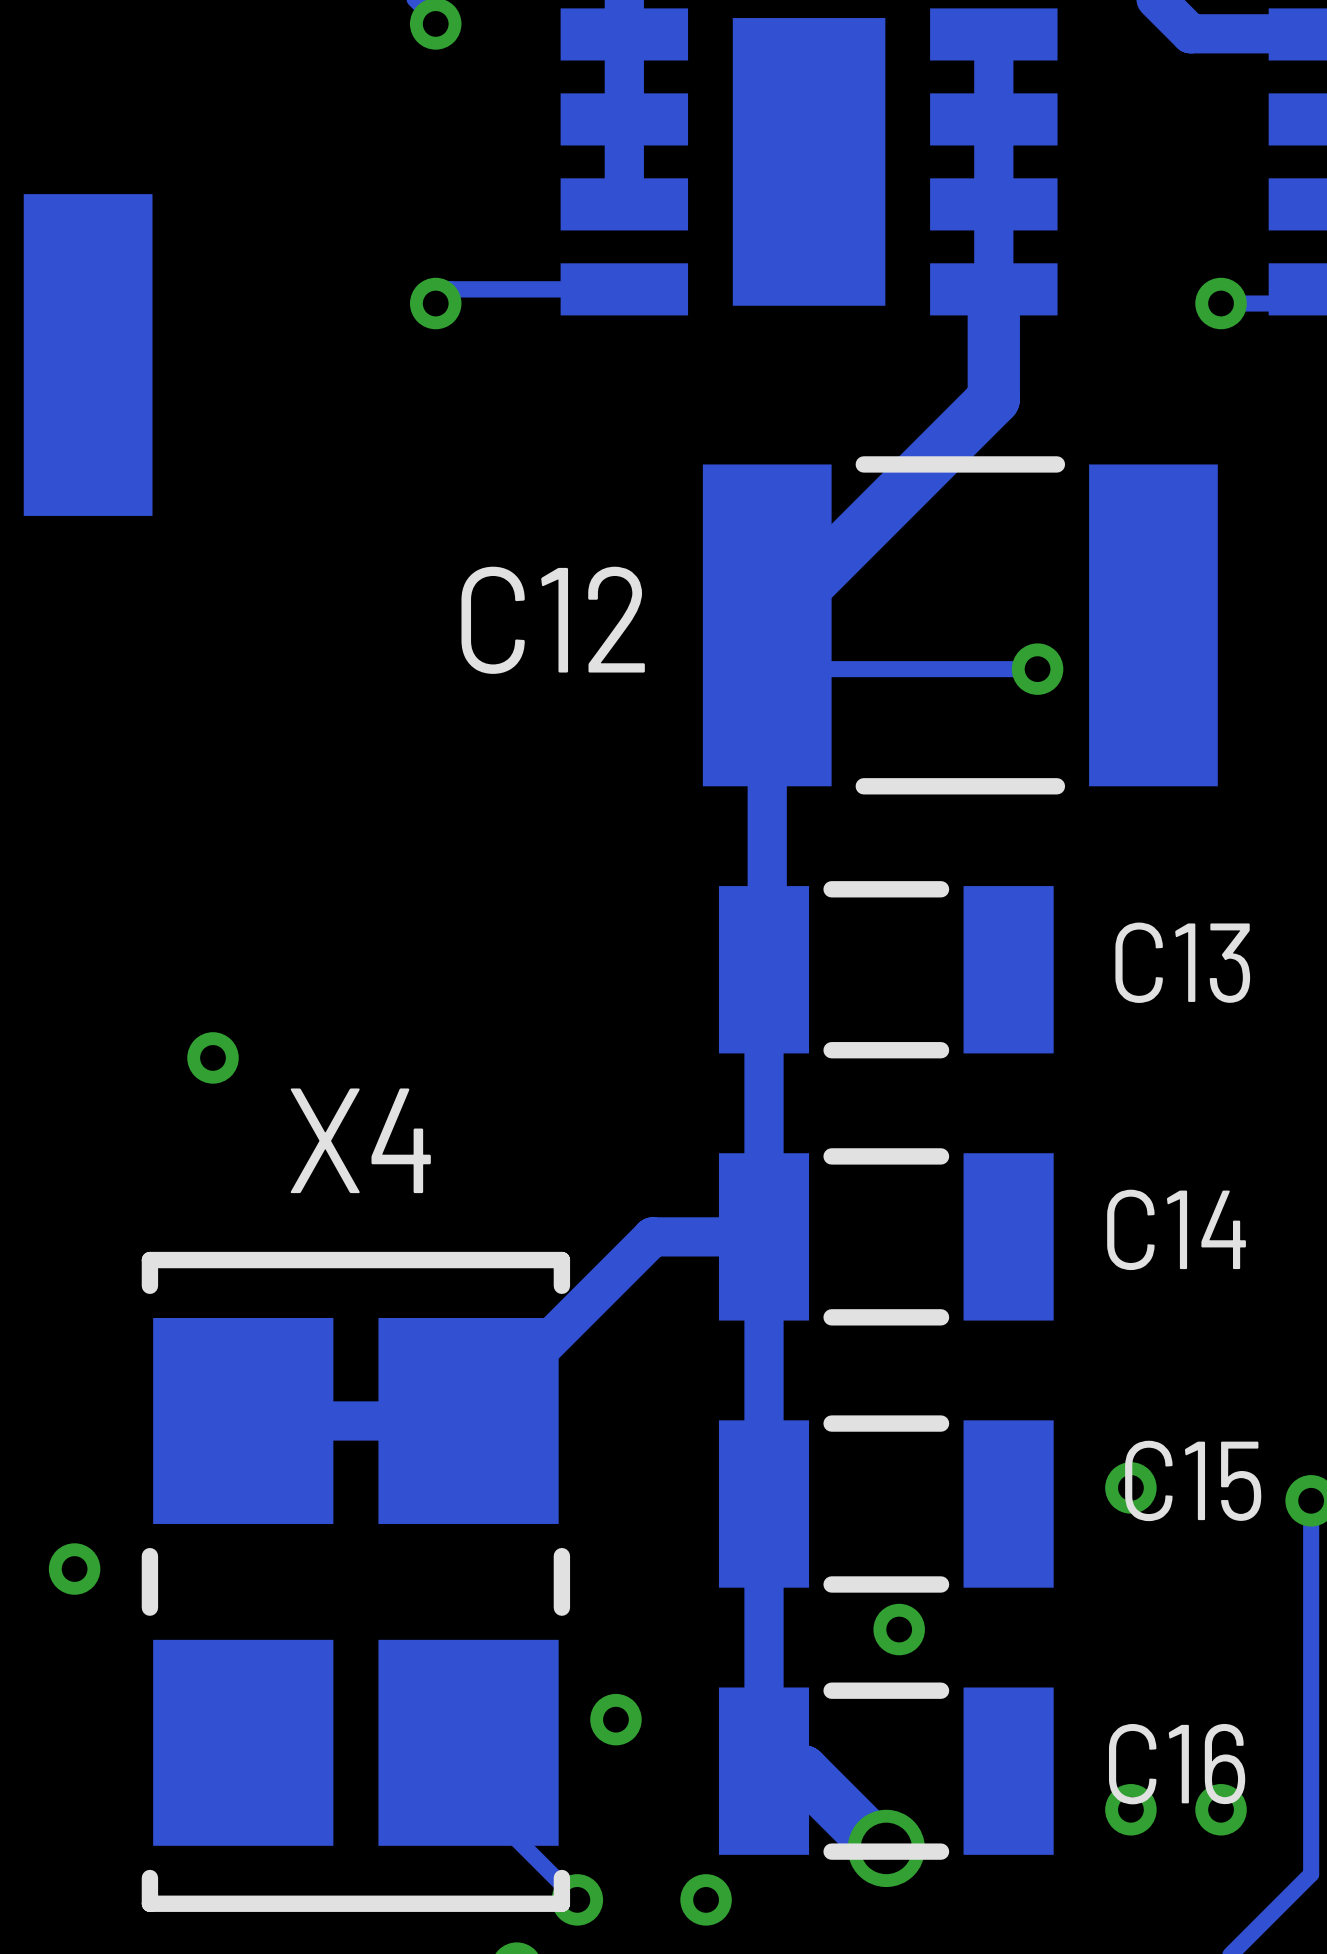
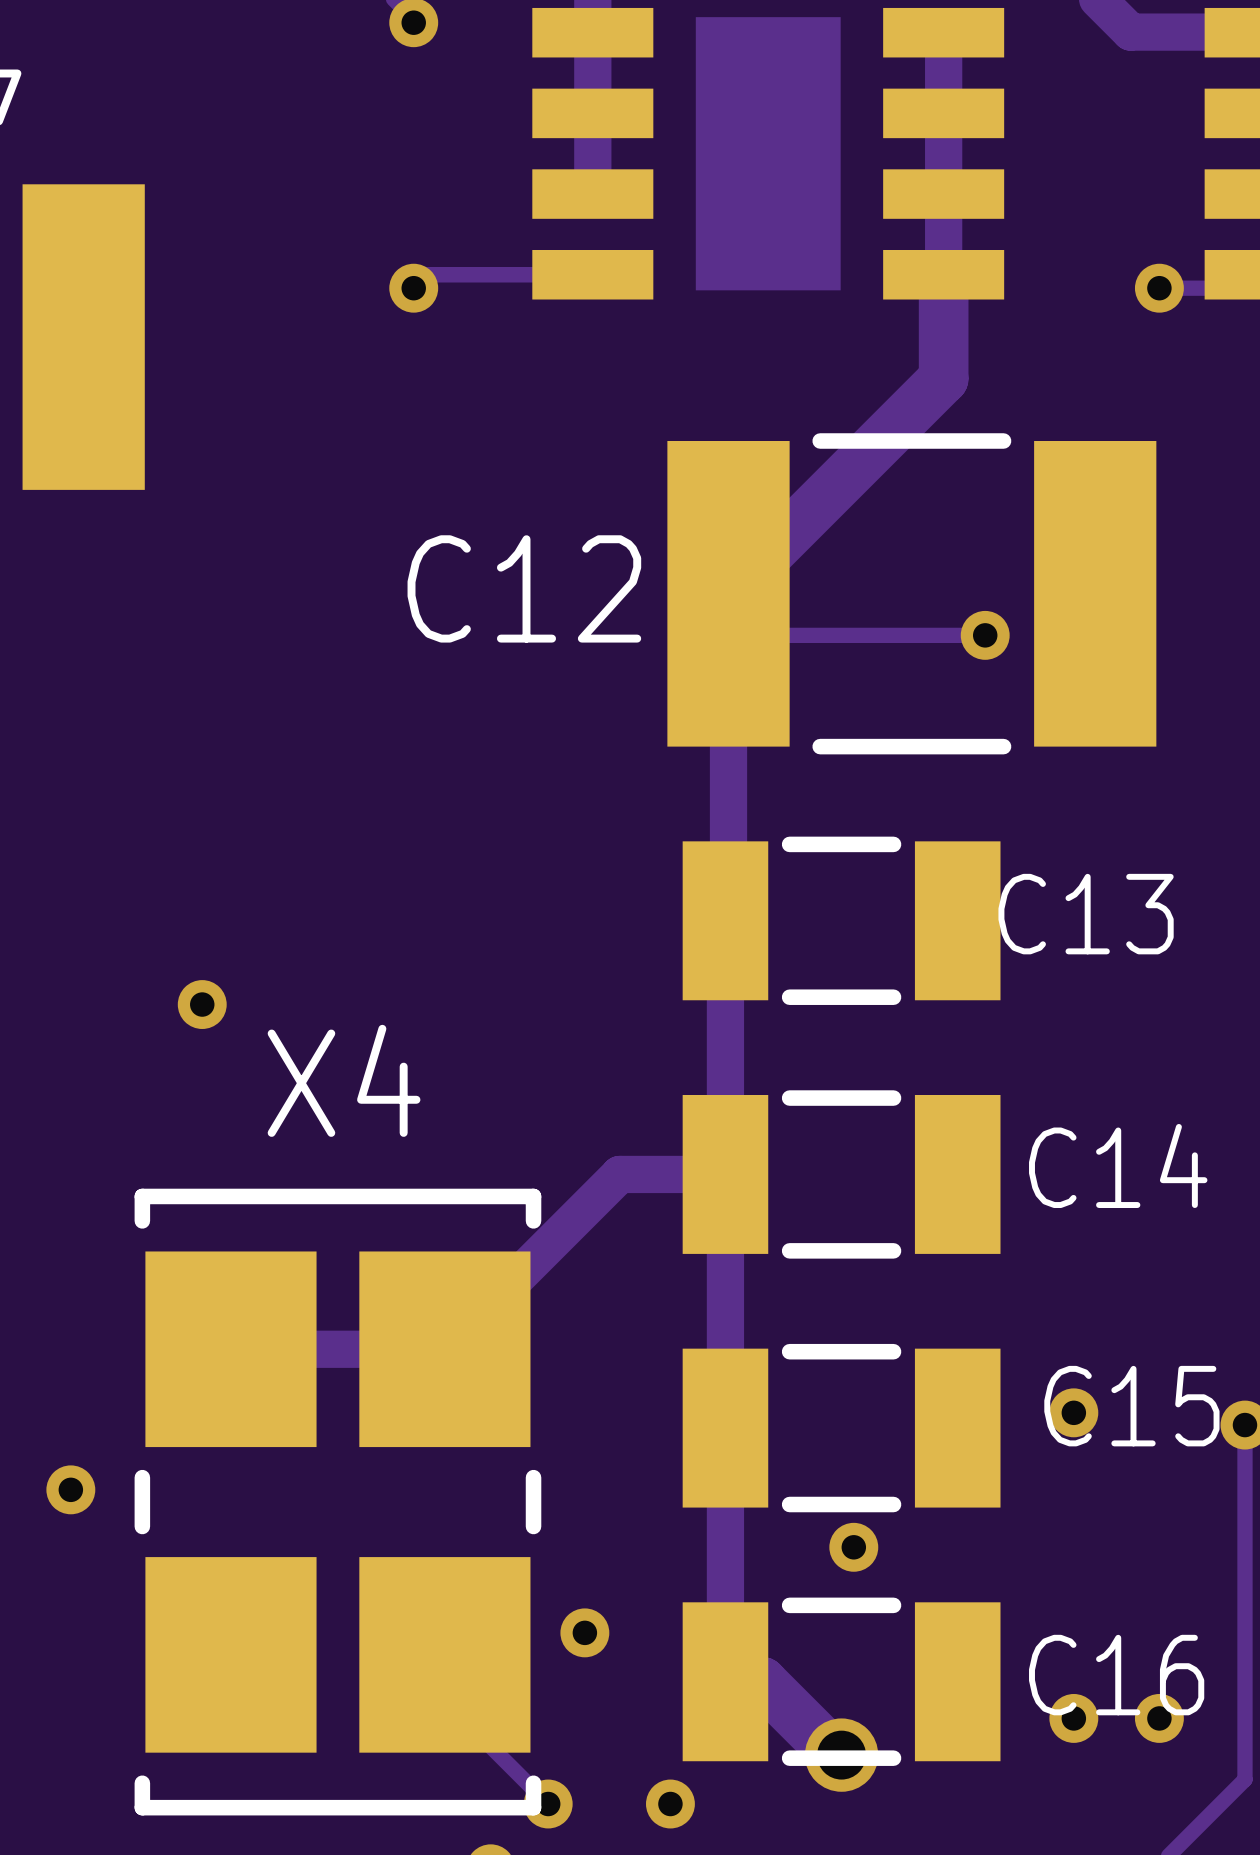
C13 name position: C13 (1182, 962) -> C13 (1086, 914)

